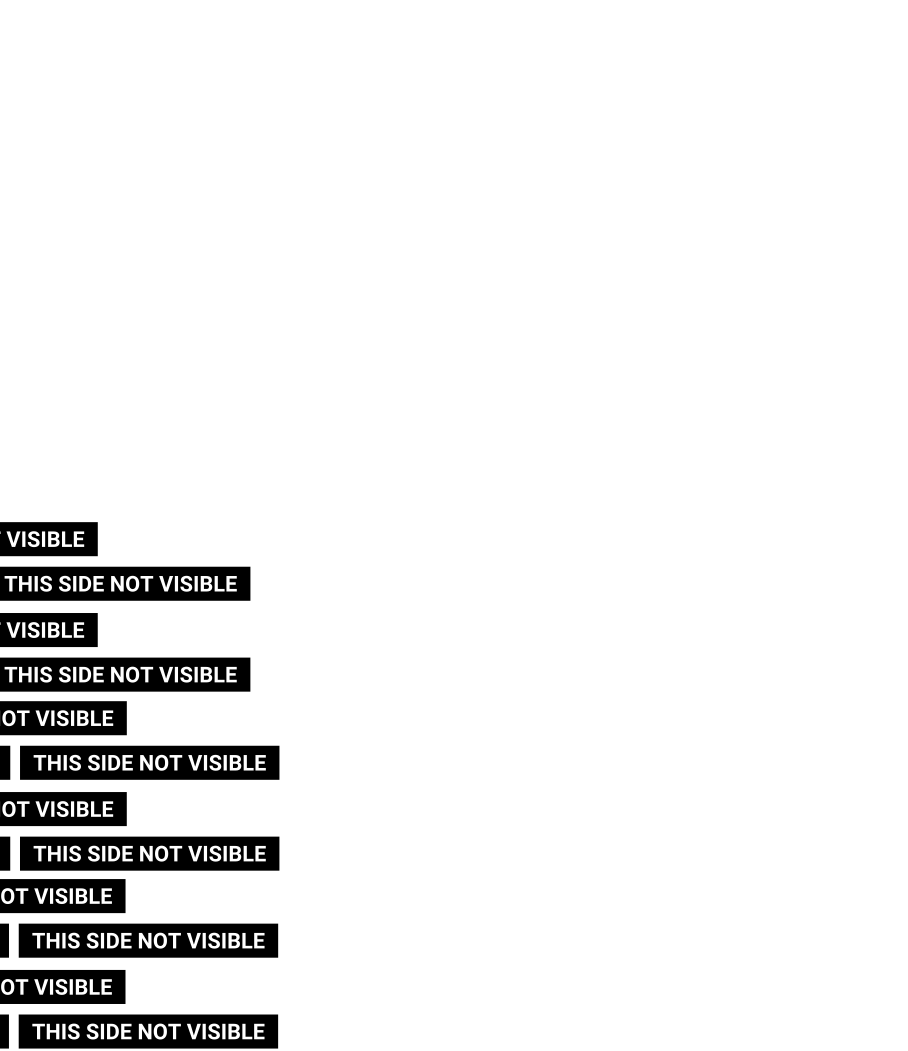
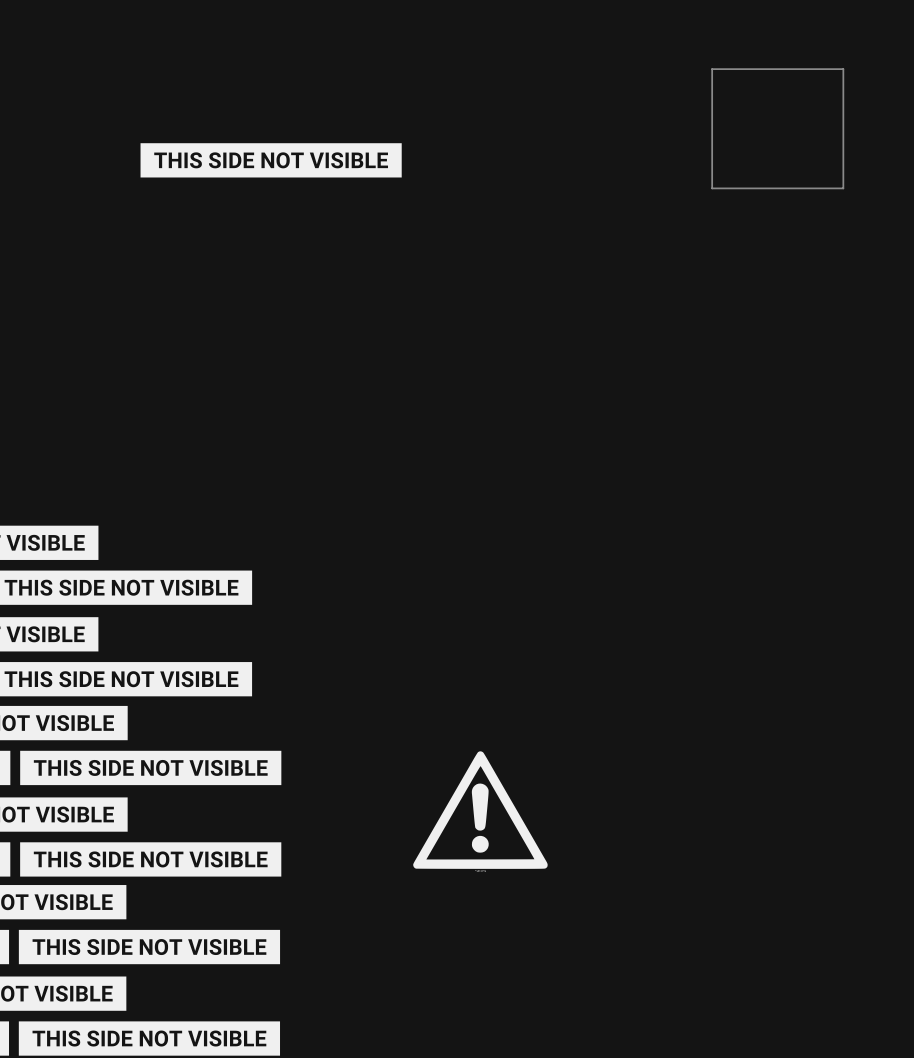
line: none -> (712, 69) (712, 188) (843, 188) (843, 69) (712, 69)
drawing: none -> [140, 143, 402, 178]
drawing: none -> [413, 751, 548, 872]

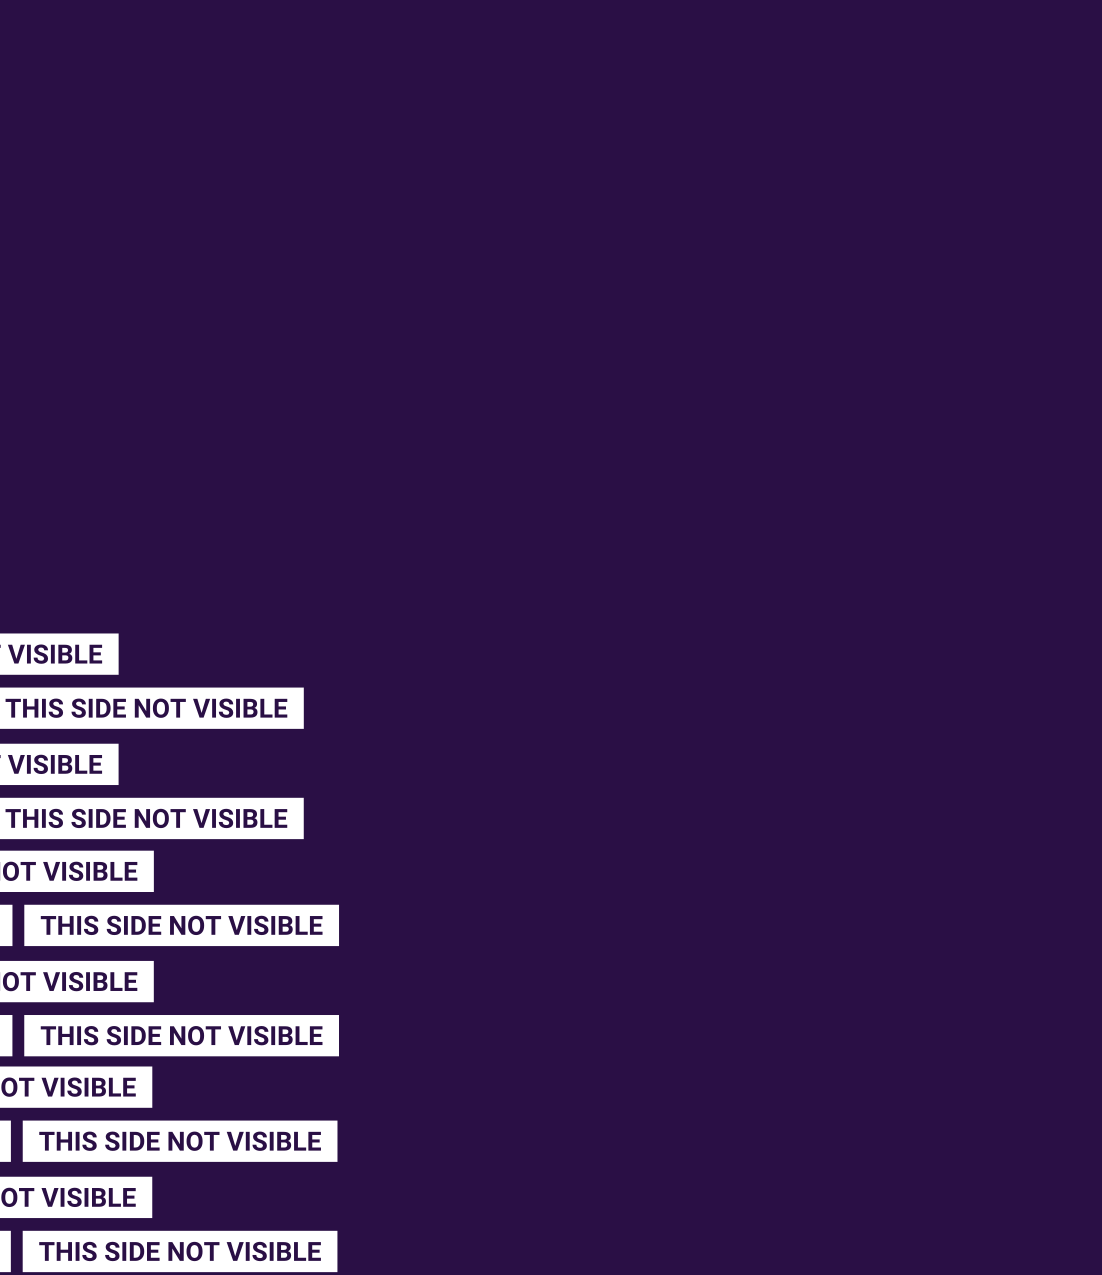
line: (712, 69) (712, 188) (843, 188) (843, 69) (712, 69) -> none
drawing: [140, 143, 402, 178] -> none
drawing: [413, 751, 548, 872] -> none

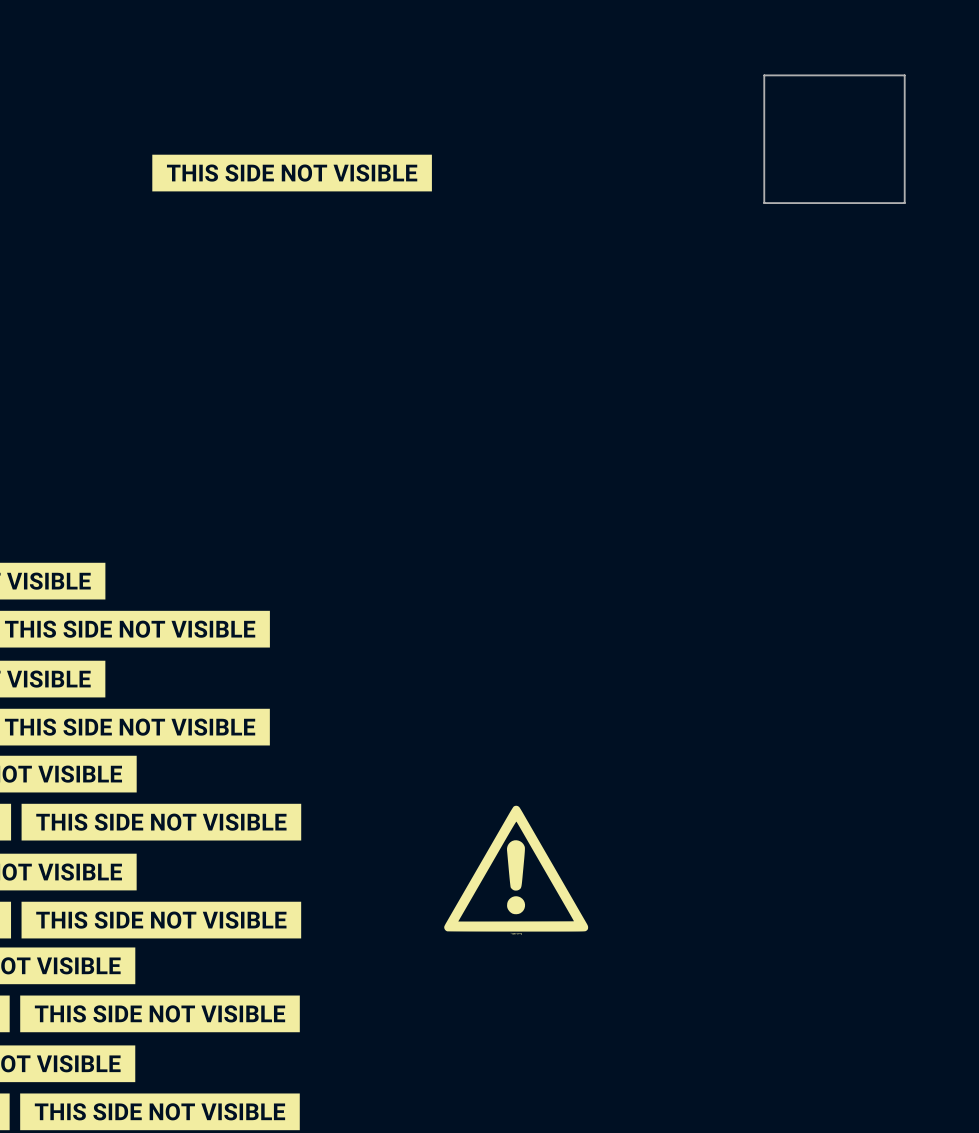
line: none -> (764, 75) (764, 203) (904, 203) (904, 75) (764, 75)
drawing: none -> [152, 154, 432, 192]
drawing: none -> [444, 805, 589, 935]

